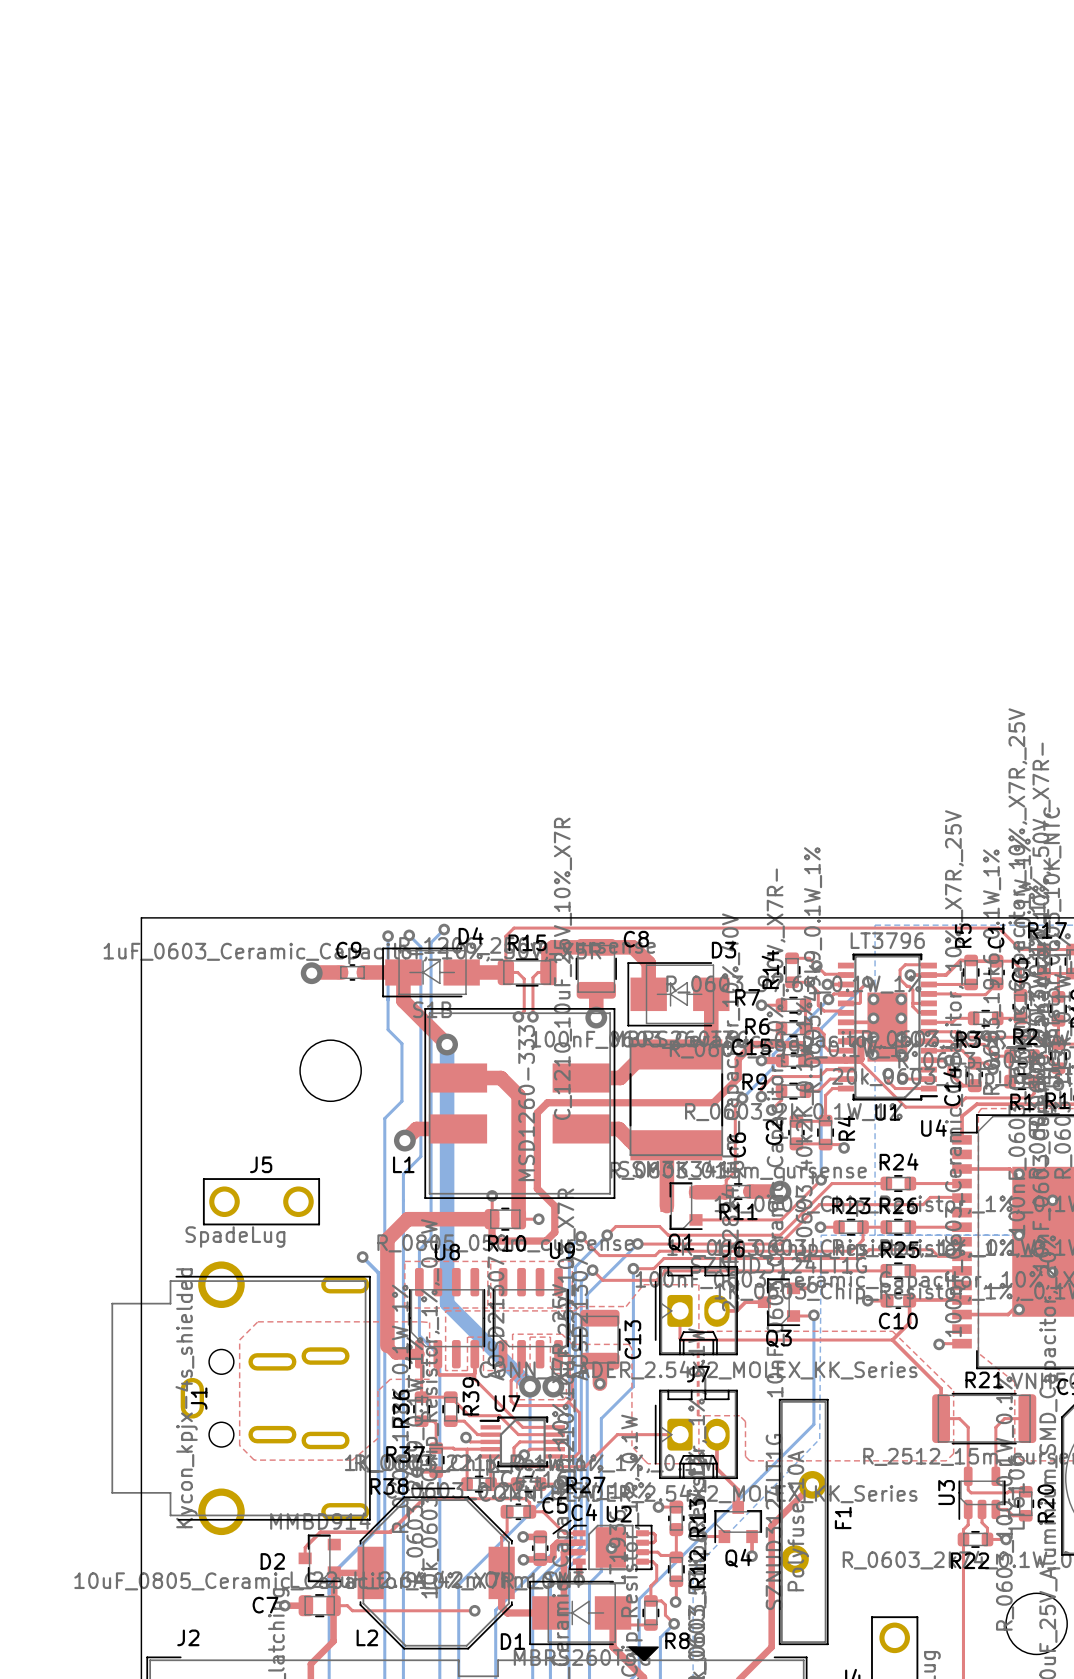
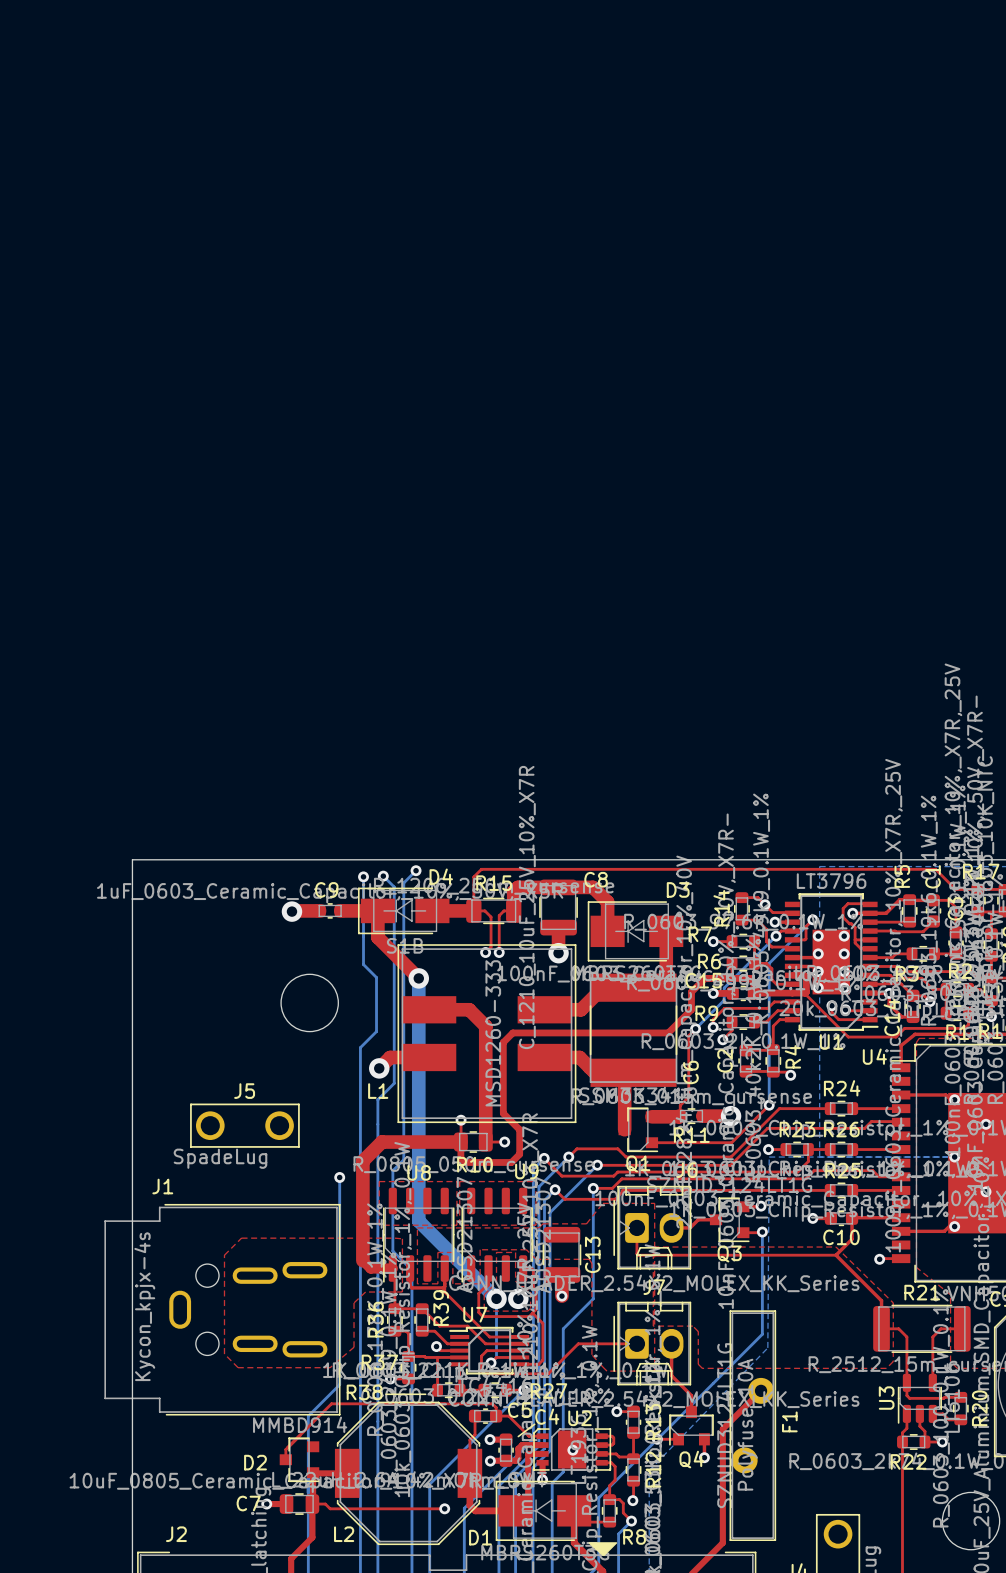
bottom track: (362, 1257) (378, 1272) (378, 1527) (329, 1577) -> (339, 1177) (339, 1384) (308, 1416) (308, 1477)
J1 footprint: [111, 1261, 371, 1536] -> [104, 1203, 341, 1416]
J1 value: Kycon_kpjx-4s_shielded (186, 1398) -> Kycon_kpjx-4s (144, 1306)
J1 name position: J1 (199, 1398) -> J1 (162, 1186)
top track: (423, 1498) (390, 1532) (320, 1532) -> (396, 1403) (331, 1403) (300, 1435)

